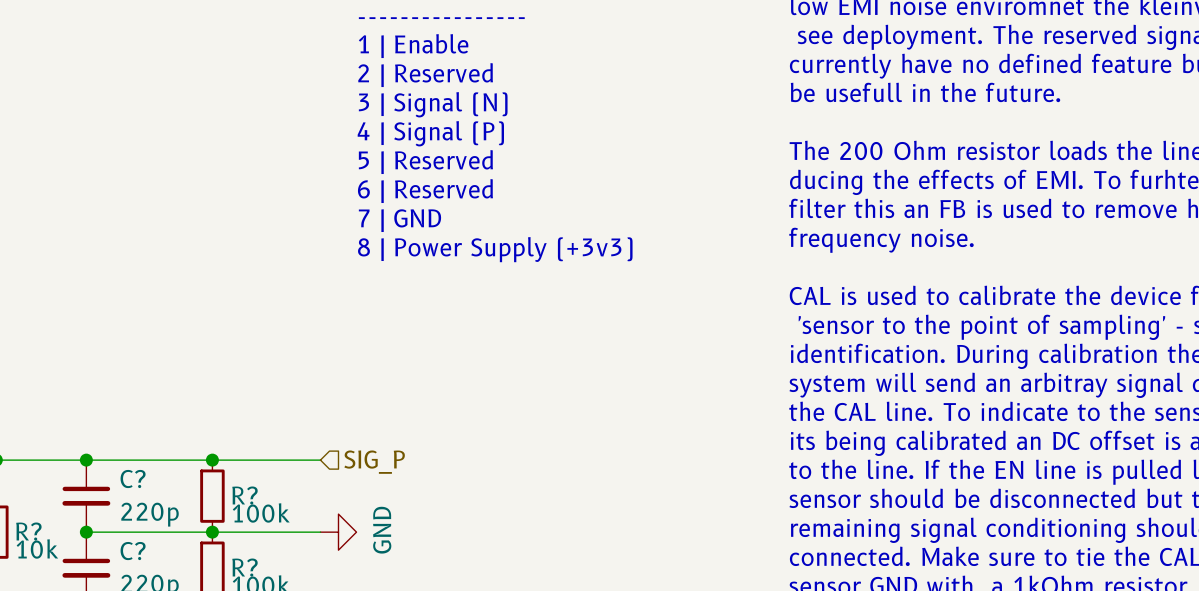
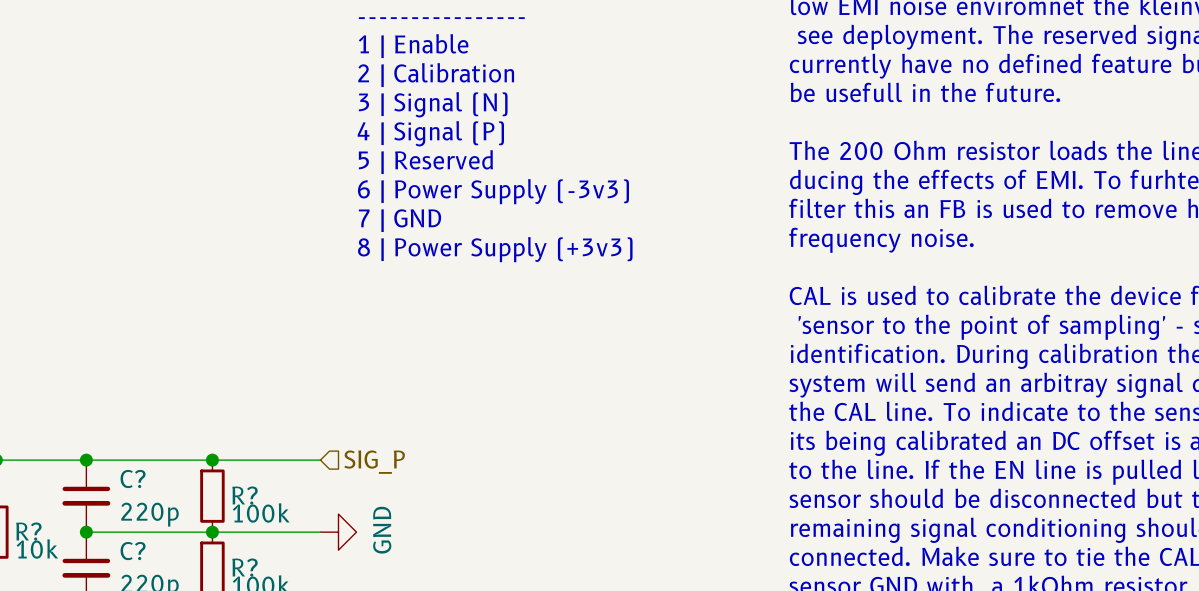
text: 2 | Reserved (425, 75) -> 2 | Calibration (436, 75)
text: 6 | Reserved (425, 191) -> 6 | Power Supply (-3v3) (493, 191)

